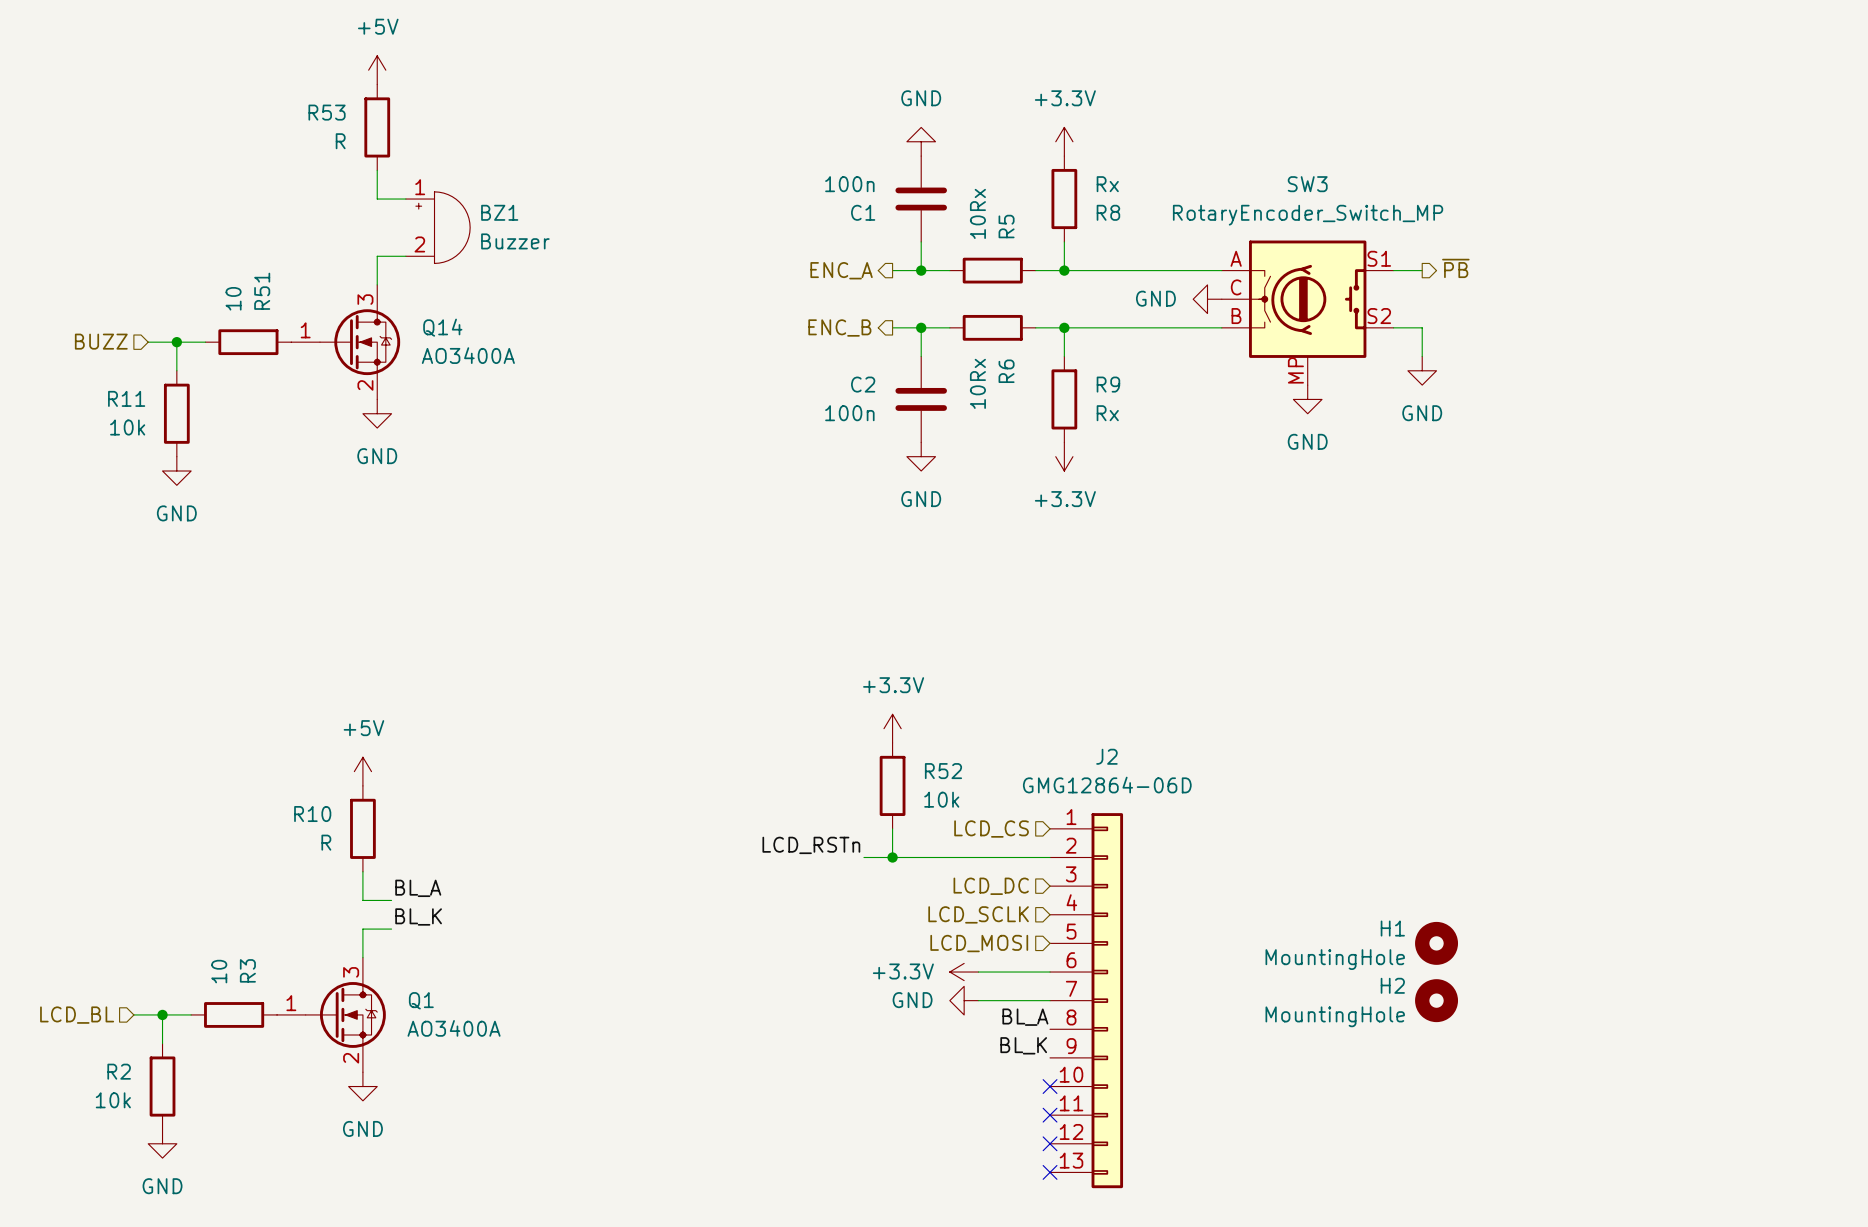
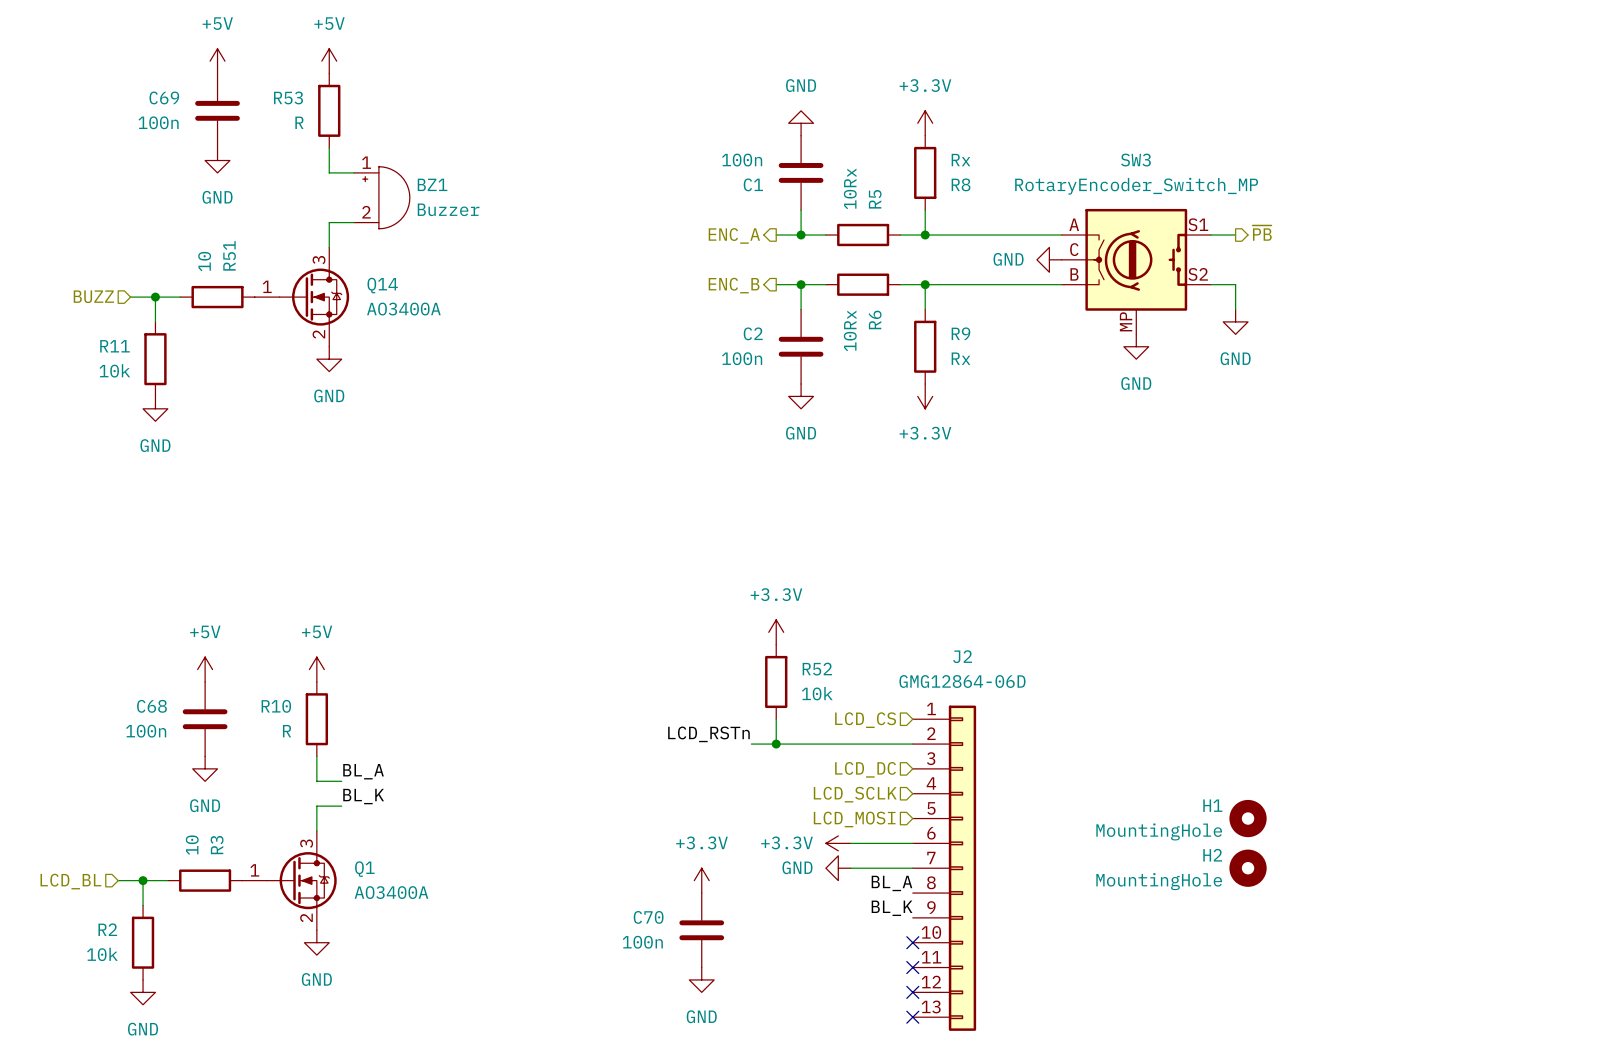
power symbol: none -> +5V (217, 61)
C69: none -> 100n (217, 110)
power symbol: none -> GND (217, 160)
power symbol: none -> +5V (205, 669)
C68: none -> 100n (205, 719)
power symbol: none -> GND (205, 768)
power symbol: none -> +3.3V (701, 880)
C70: none -> 100n (701, 930)
power symbol: none -> GND (701, 979)

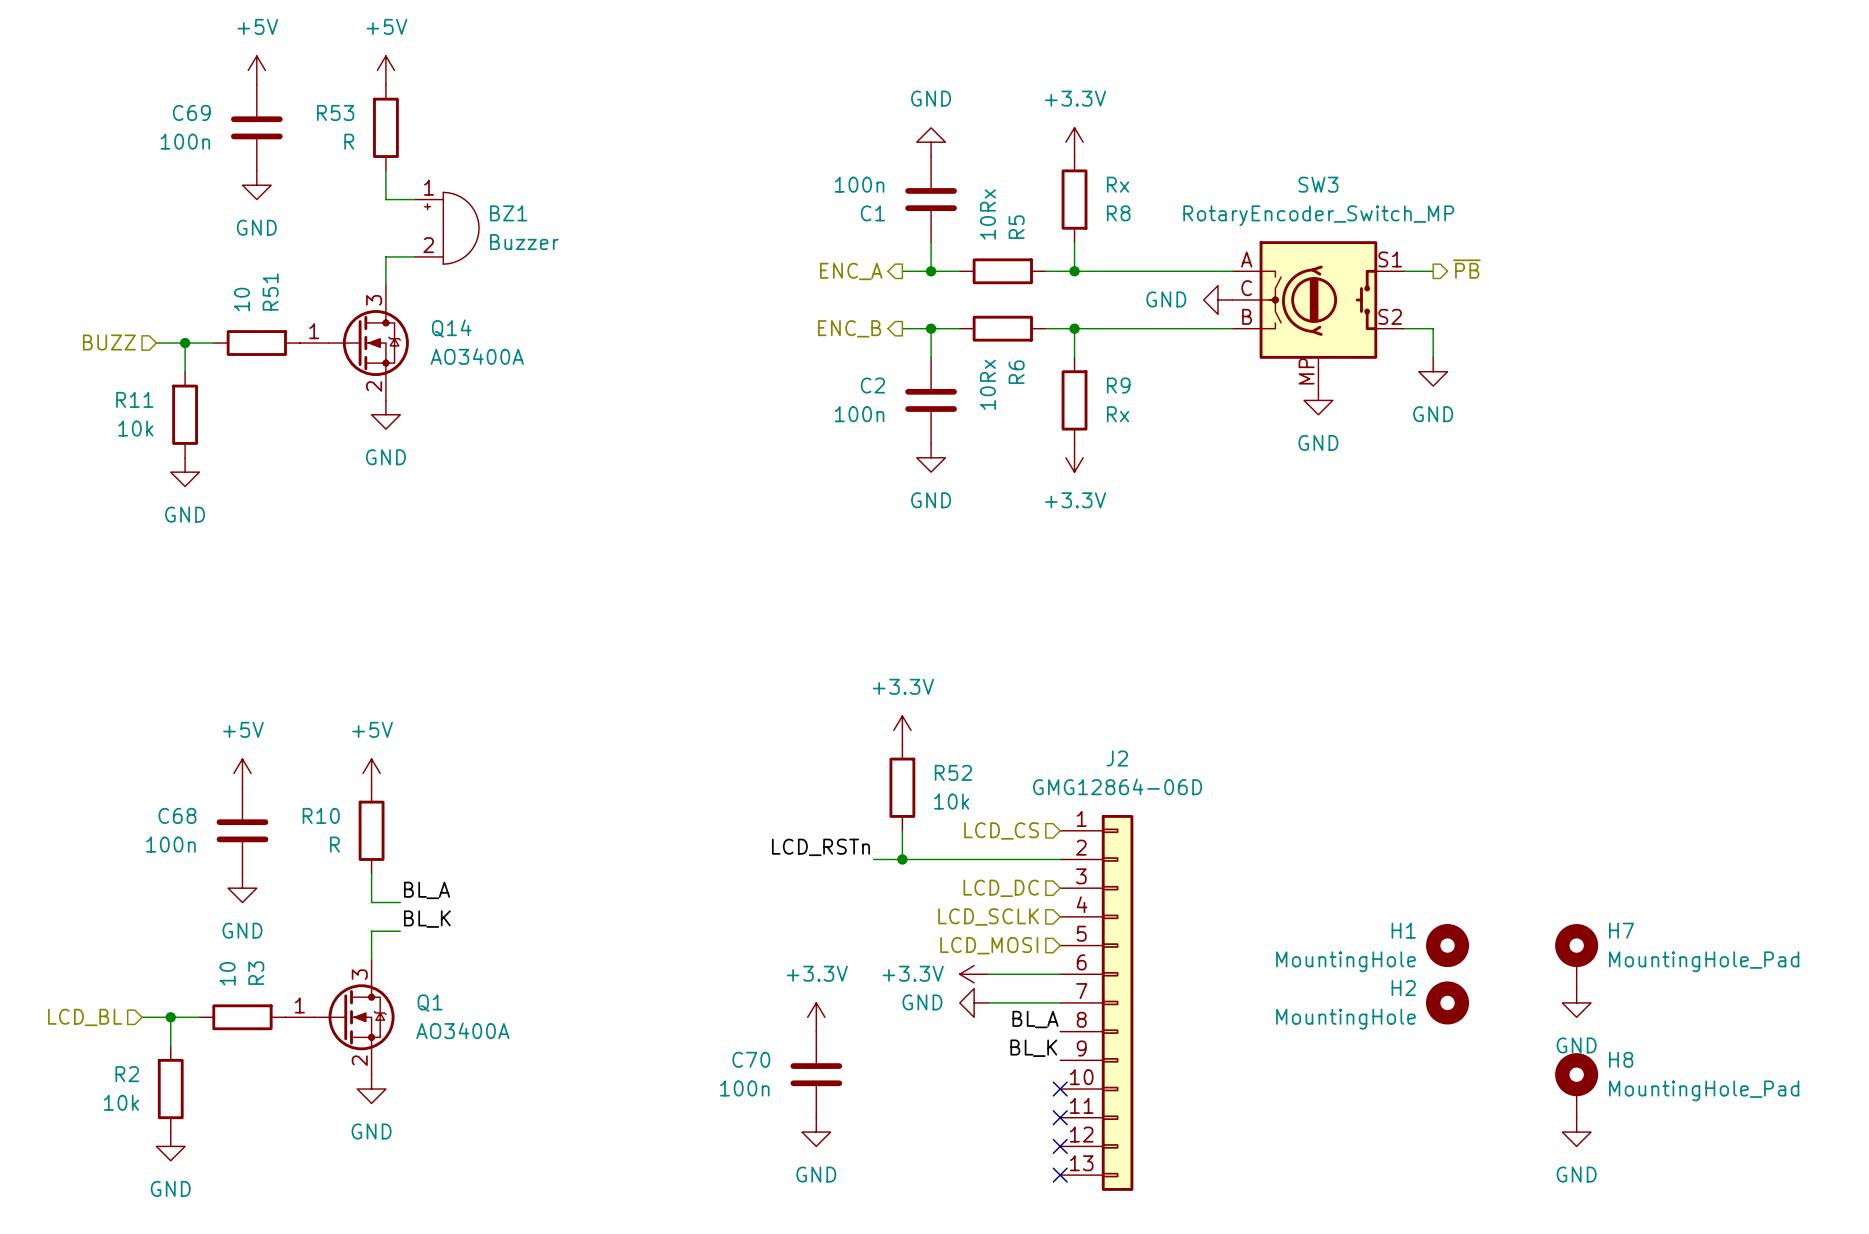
H7: none -> MountingHole_Pad (1576, 956)
power symbol: none -> GND (1576, 1002)
H8: none -> MountingHole_Pad (1576, 1085)
power symbol: none -> GND (1576, 1132)

